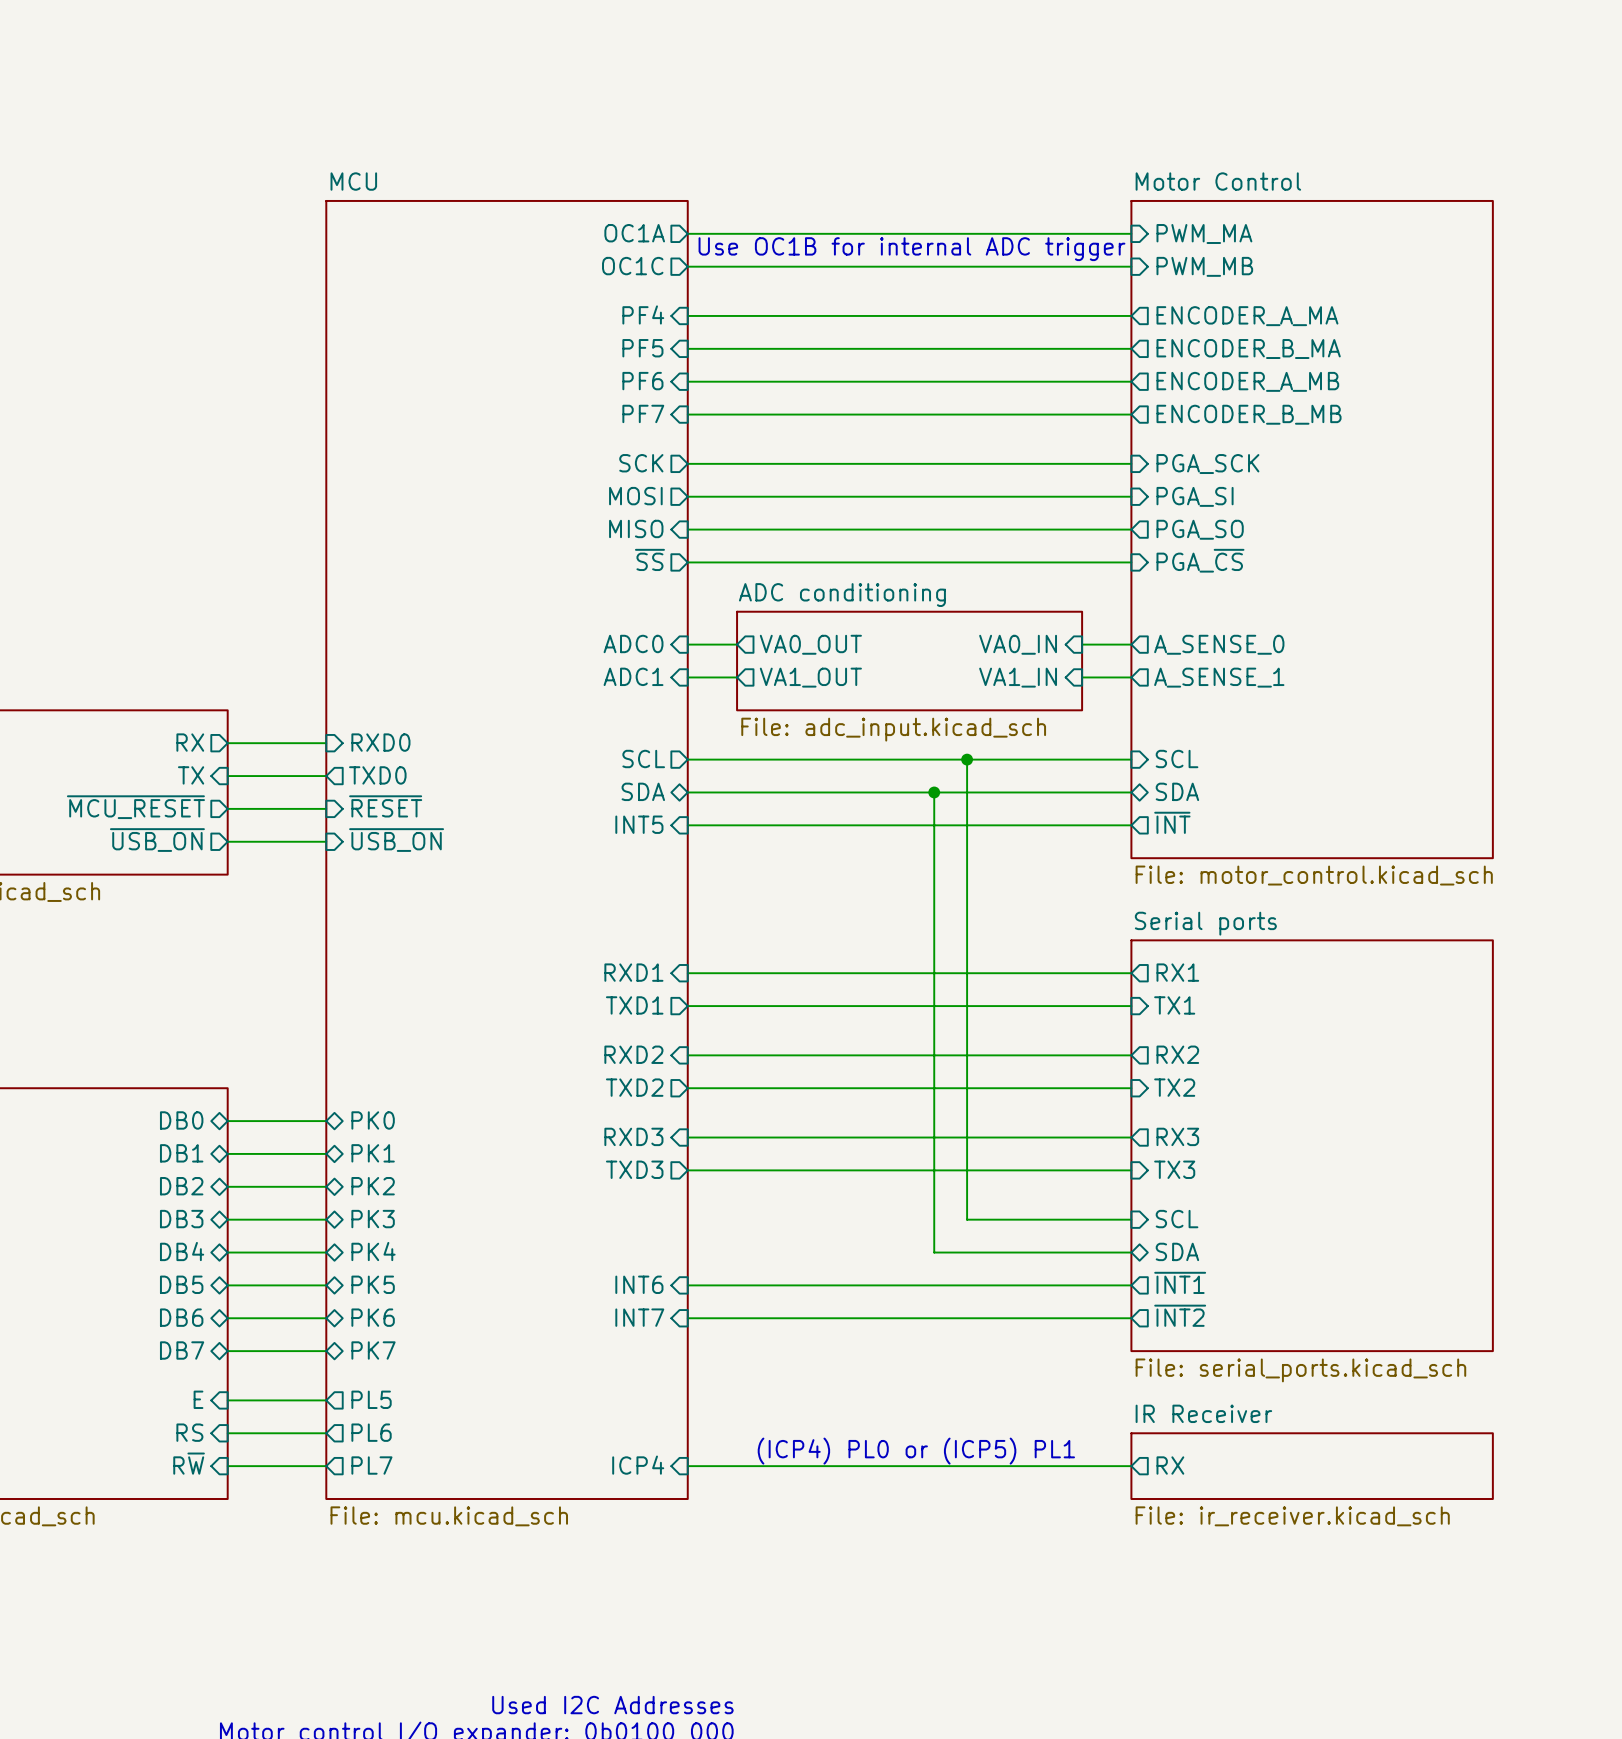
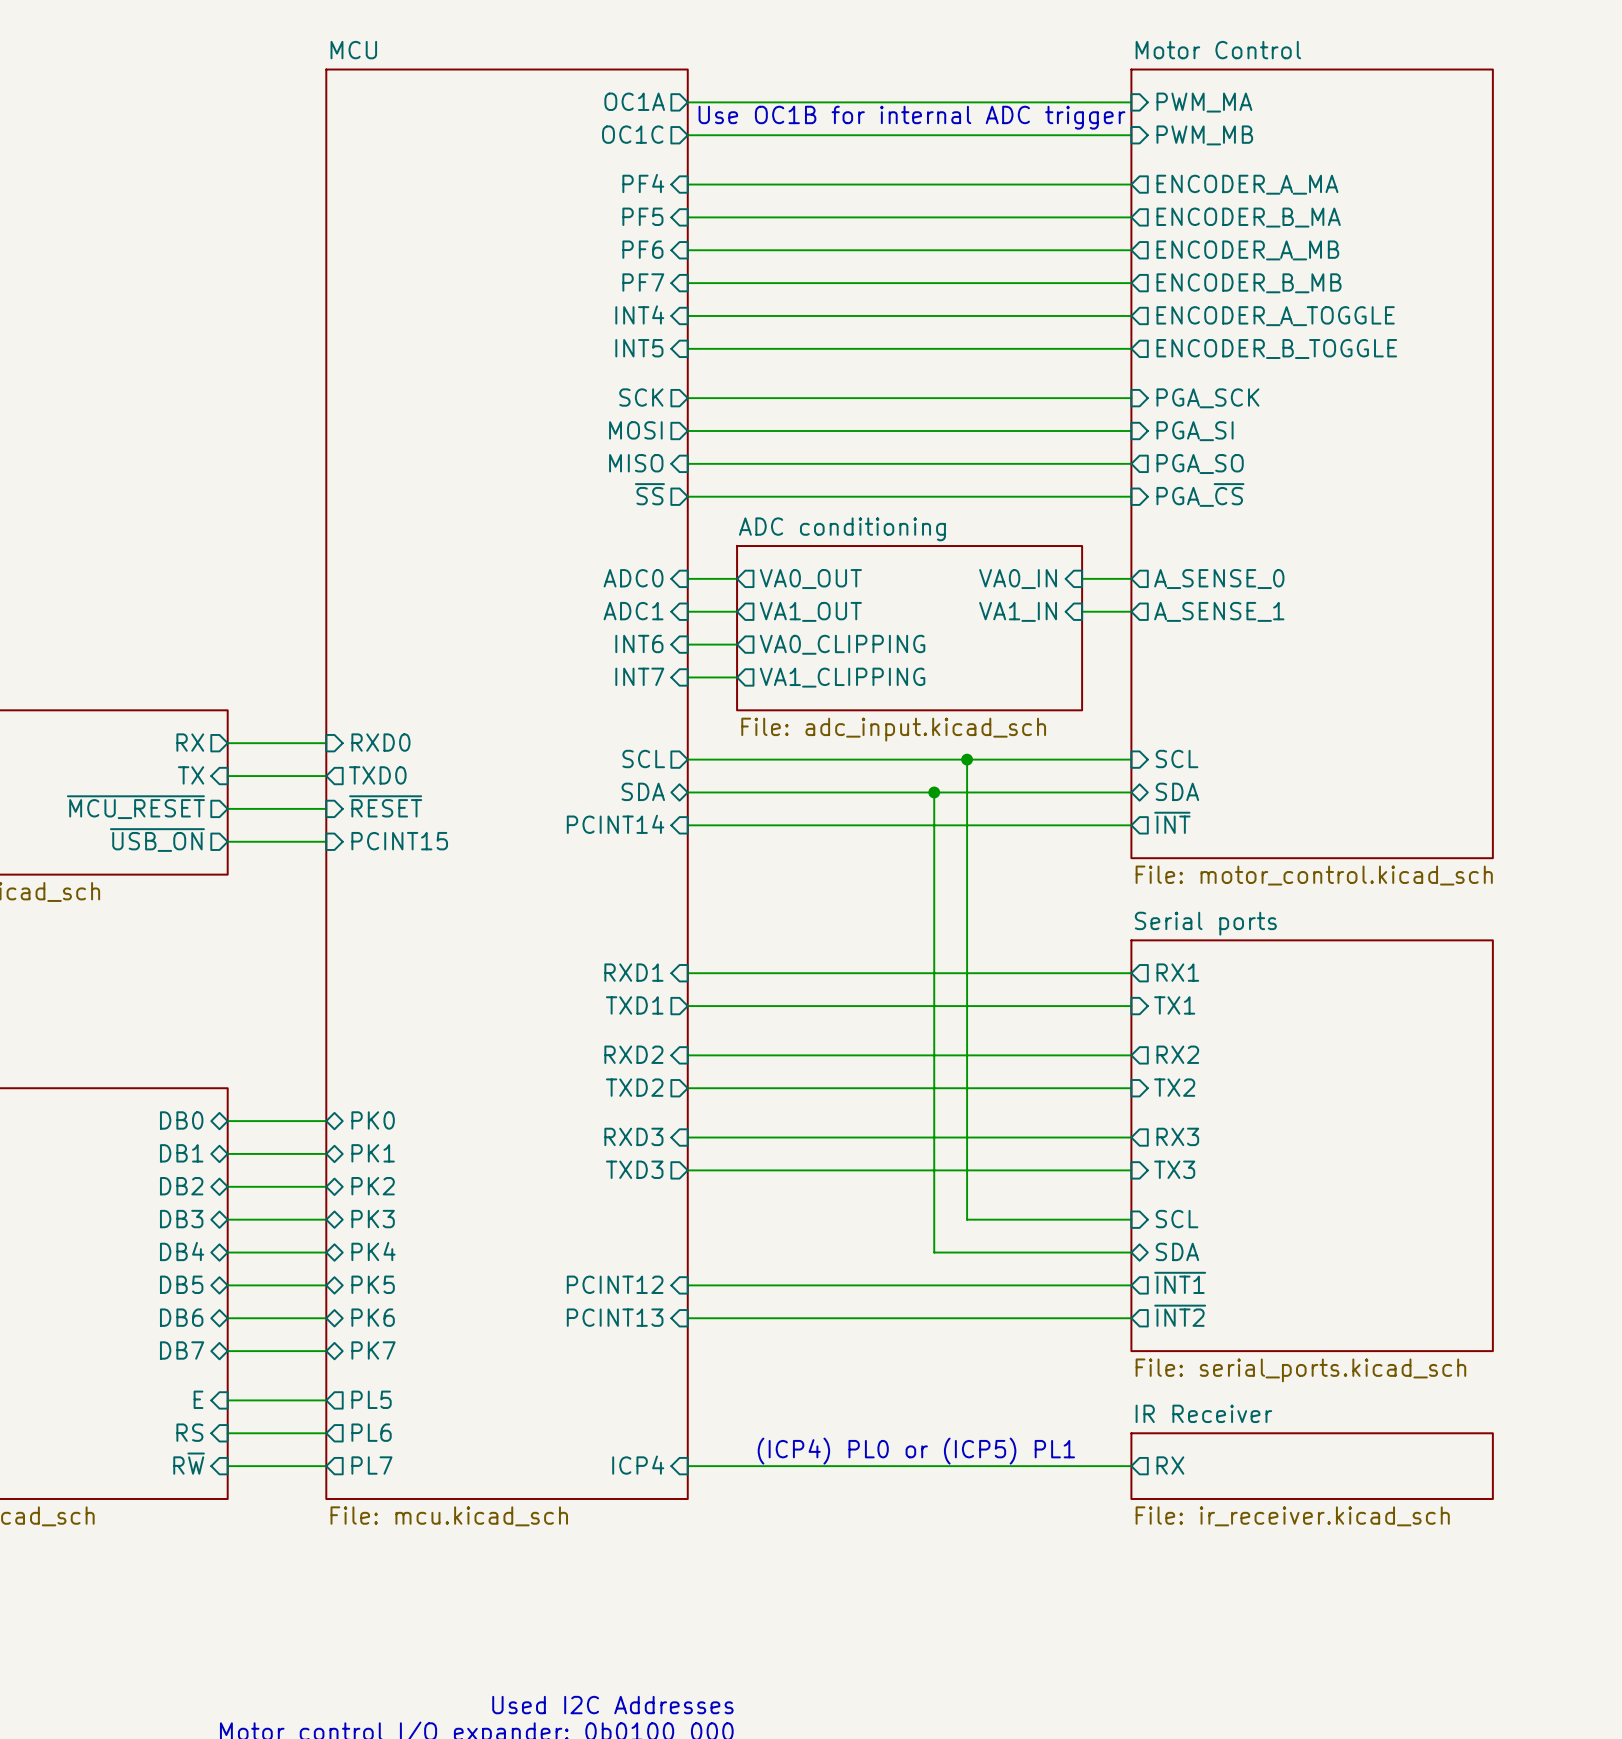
sheet pin: none -> PF4 (643, 183)
wire: none -> (687, 184) (1131, 184)
sheet pin: none -> ENCODER_A_MA (1247, 184)
sheet pin: none -> PF5 (642, 216)
wire: none -> (687, 217) (1131, 217)
sheet pin: none -> ENCODER_B_MA (1248, 217)
sheet pin position: OC1A (634, 233) -> OC1A (634, 101)
wire: (687, 233) (1131, 233) -> (687, 102) (1131, 102)
sheet pin position: PWM_MA (1204, 233) -> PWM_MA (1204, 102)
text position: Use OC1B for internal ADC trigger (911, 249) -> Use OC1B for internal ADC trigger (911, 117)
sheet pin position: OC1C (632, 266) -> OC1C (632, 134)
wire: (687, 266) (1131, 266) -> (687, 135) (1131, 135)
sheet pin position: PWM_MB (1204, 266) -> PWM_MB (1204, 135)
sheet pin: PF4 (643, 314) -> INT4 (639, 314)
sheet pin: ENCODER_A_MA (1247, 316) -> ENCODER_A_TOGGLE (1275, 316)
sheet pin: PF5 (642, 348) -> INT5 (639, 348)
sheet pin: ENCODER_B_MA (1248, 349) -> ENCODER_B_TOGGLE (1276, 349)
sheet pin position: PF6 (642, 381) -> PF6 (642, 249)
wire: (687, 381) (1131, 381) -> (687, 250) (1131, 250)
sheet pin position: ENCODER_A_MB (1247, 381) -> ENCODER_A_MB (1247, 250)
sheet pin: none -> SCK (641, 397)
sheet pin: none -> PGA_SCK (1207, 398)
sheet pin position: PF7 (643, 413) -> PF7 (643, 282)
wire: (687, 414) (1131, 414) -> (687, 283) (1131, 283)
sheet pin position: ENCODER_B_MB (1249, 414) -> ENCODER_B_MB (1249, 283)
sheet pin: none -> MOSI (635, 430)
sheet pin: none -> PGA_SI (1195, 431)
sheet pin shape: output (641, 463) -> input (636, 463)
sheet pin: SCK (641, 463) -> MISO (636, 463)
sheet Motor Control: none -> File: motor_control.kicad_sch (1312, 463)
sheet pin shape: input (1207, 464) -> output (1200, 464)
sheet pin: PGA_SCK (1207, 464) -> PGA_SO (1200, 464)
sheet pin: MOSI (635, 496) -> ~{SS} (649, 494)
sheet pin: PGA_SI (1195, 496) -> PGA_~{CS} (1200, 494)
sheet pin: MISO (636, 528) -> none
wire: (687, 529) (1131, 529) -> (687, 398) (1131, 398)
sheet pin: PGA_SO (1200, 529) -> none
sheet Motor Control: File: motor_control.kicad_sch (1312, 529) -> none
sheet pin: ~{SS} (649, 559) -> none
sheet pin: PGA_~{CS} (1200, 560) -> none
wire: (687, 562) (1131, 562) -> (687, 430) (1131, 430)
sheet pin: none -> ADC0 (633, 578)
wire: none -> (687, 578) (737, 578)
sheet pin: none -> VA0_OUT (810, 579)
sheet pin: none -> ADC1 (633, 611)
wire: none -> (687, 611) (737, 611)
sheet pin: none -> VA1_OUT (810, 611)
sheet ADC conditioning: none -> File: adc_input.kicad_sch (909, 628)
sheet pin: ADC0 (633, 643) -> INT6 (639, 643)
sheet pin: VA0_OUT (810, 644) -> VA0_CLIPPING (842, 644)
sheet pin position: VA0_IN (1018, 644) -> VA0_IN (1018, 579)
wire: (1082, 644) (1131, 644) -> (1082, 611) (1131, 611)
sheet pin position: A_SENSE_0 (1219, 644) -> A_SENSE_0 (1219, 579)
sheet ADC conditioning: File: adc_input.kicad_sch (909, 661) -> none
sheet pin: ADC1 (633, 676) -> INT7 (639, 676)
sheet pin: VA1_OUT (810, 677) -> VA1_CLIPPING (842, 677)
sheet pin position: VA1_IN (1018, 677) -> VA1_IN (1018, 611)
wire: (1082, 677) (1131, 677) -> (1082, 578) (1131, 578)
sheet pin position: A_SENSE_1 (1219, 677) -> A_SENSE_1 (1219, 611)
sheet MCU: none -> File: mcu.kicad_sch (507, 784)
sheet pin: INT5 (639, 824) -> PCINT14 (615, 824)
sheet pin: ~{USB_ON} (396, 840) -> PCINT15 (399, 841)
sheet MCU: File: mcu.kicad_sch (507, 849) -> none
sheet pin: INT6 (639, 1284) -> PCINT12 (615, 1284)
sheet pin: INT7 (639, 1317) -> PCINT13 (615, 1317)

